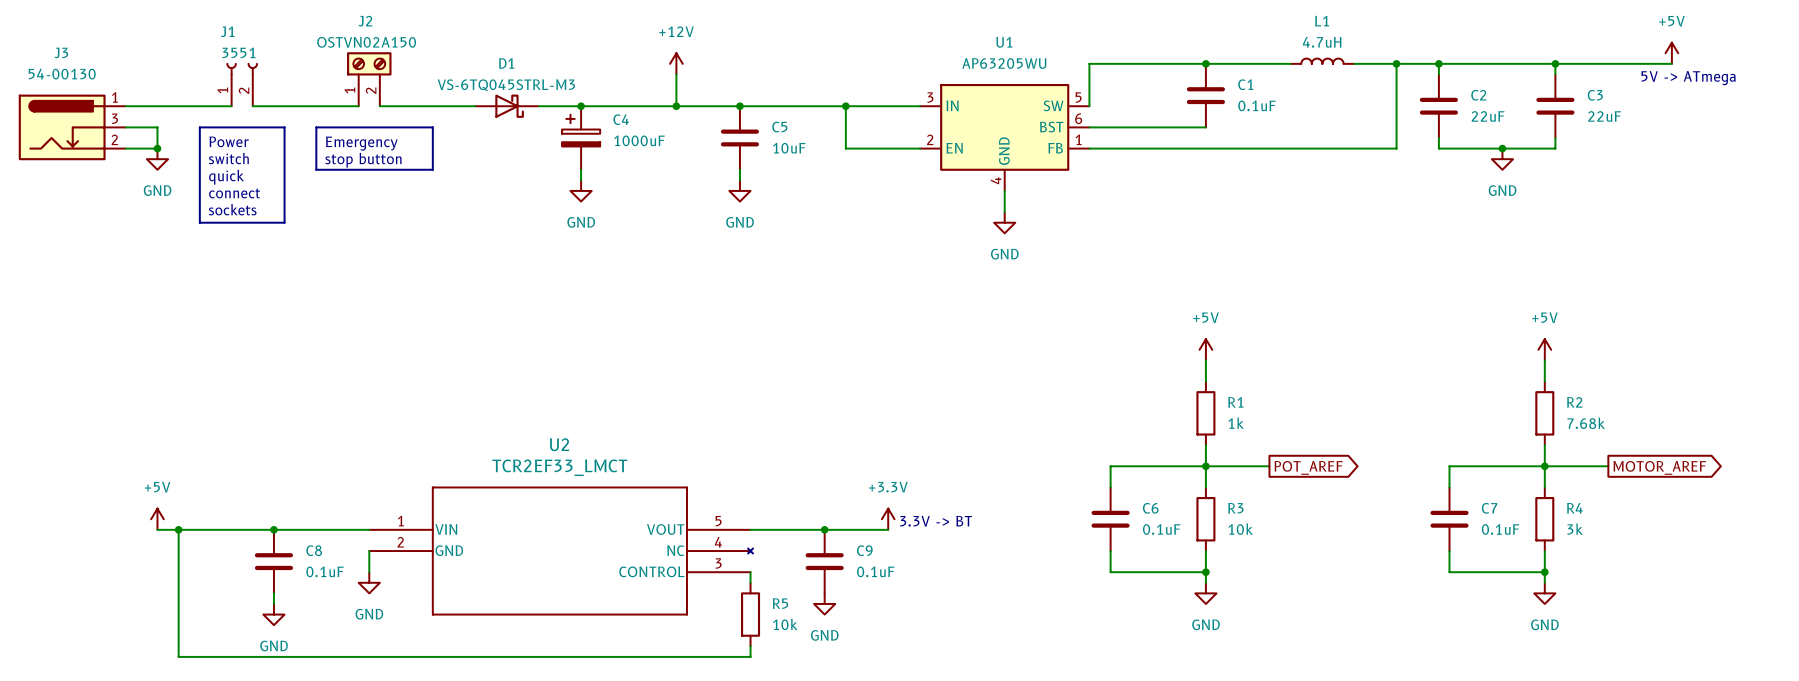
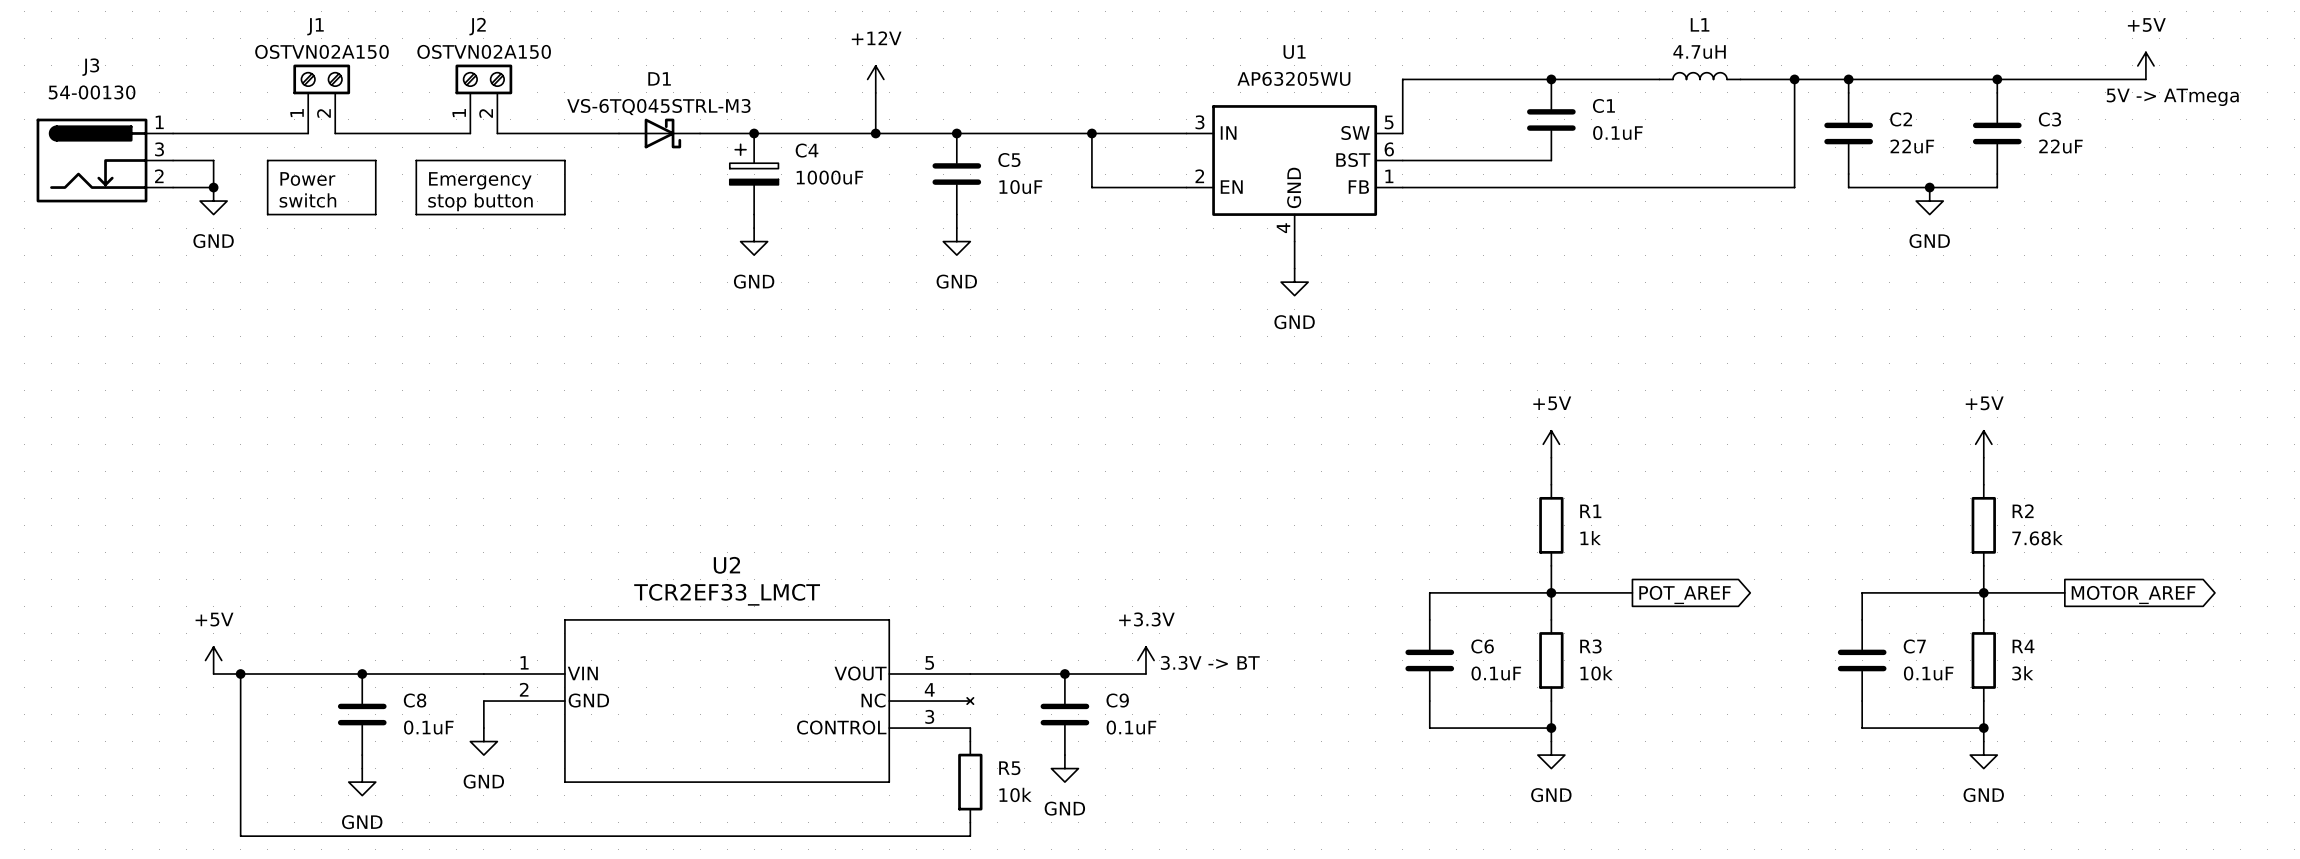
J1 value: 3551 (238, 52) -> OSTVN02A150 (321, 51)
J1 symbol: [226, 63, 258, 107] -> [293, 64, 351, 134]
line: (199, 169) (199, 222) (284, 222) (284, 169) -> (267, 214) (375, 214)
text: quick (226, 177) -> none
text: connect (234, 193) -> none
text: sockets (232, 209) -> none

